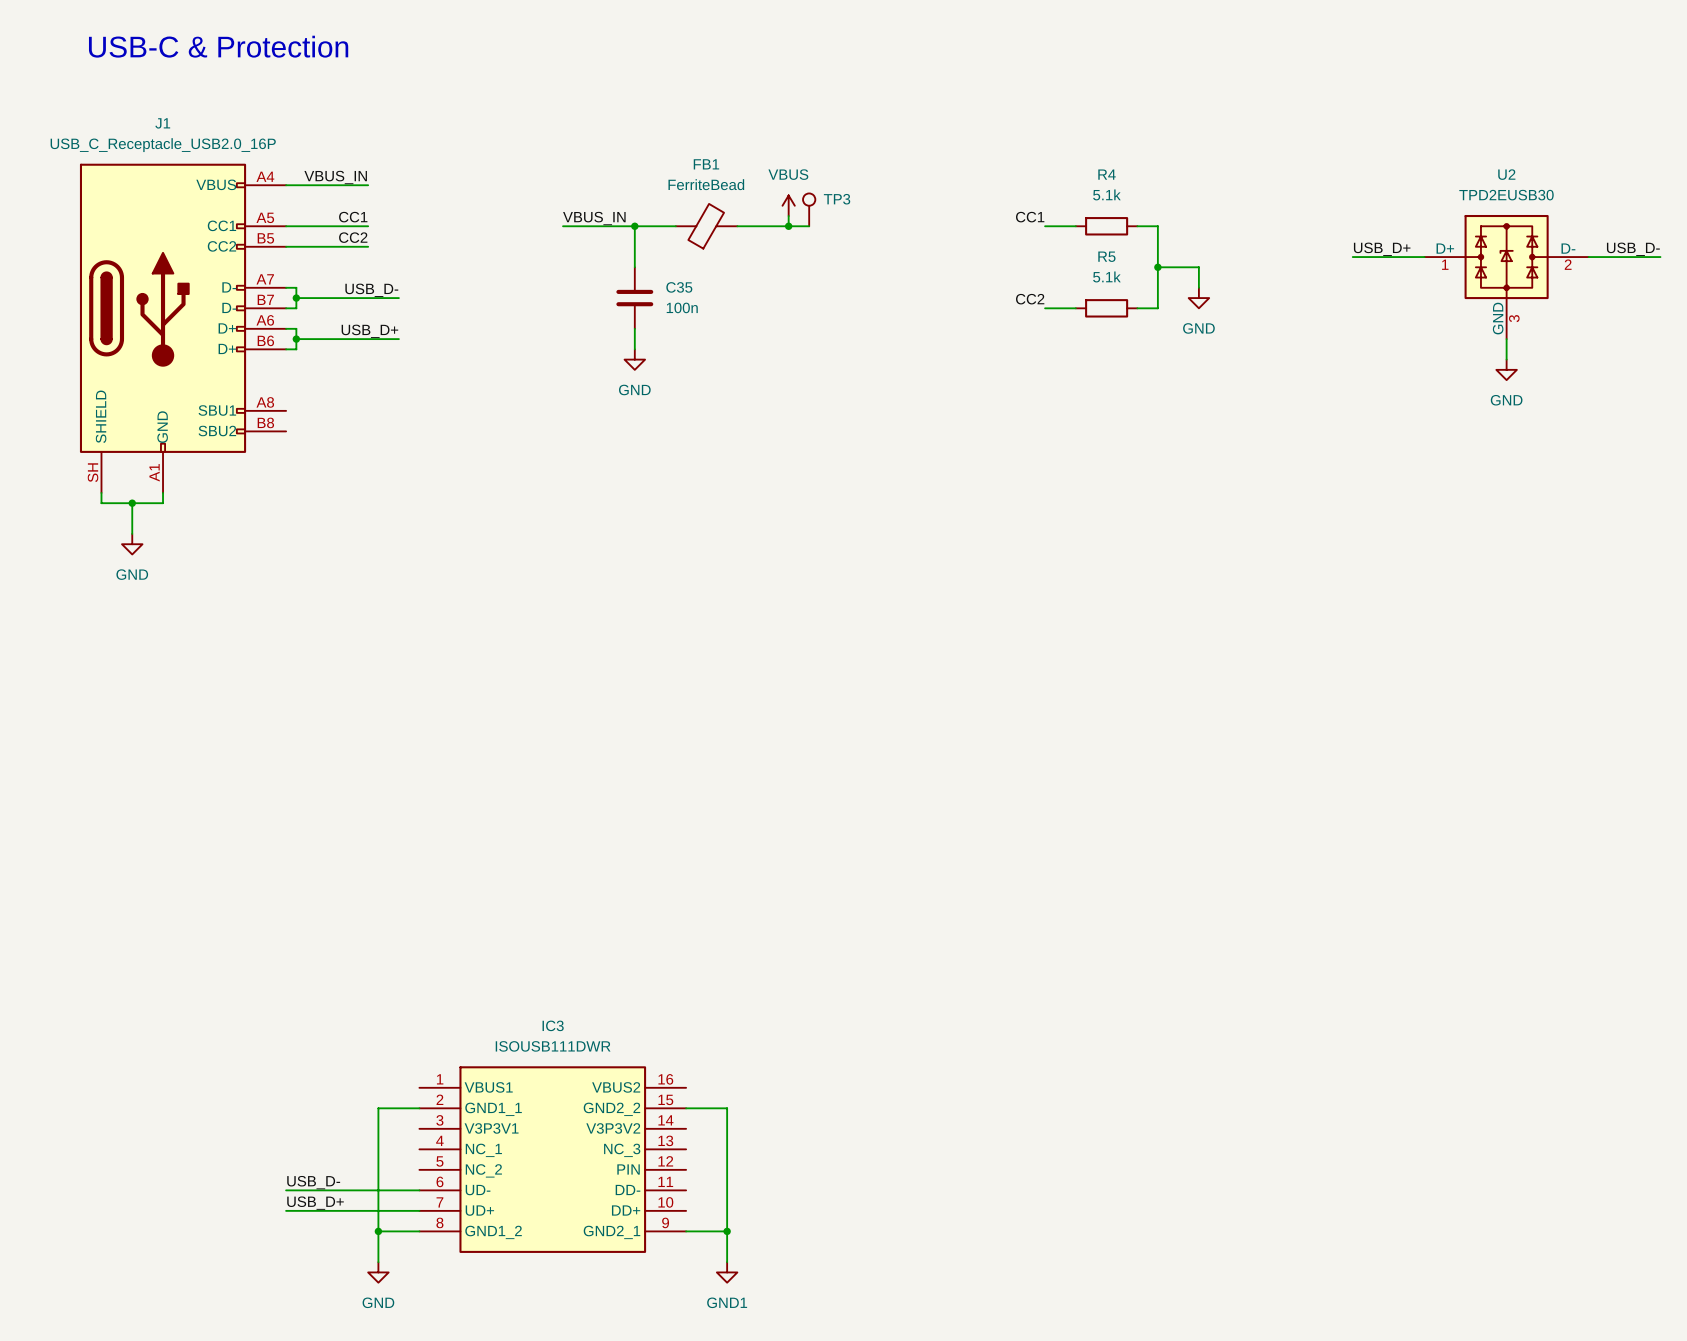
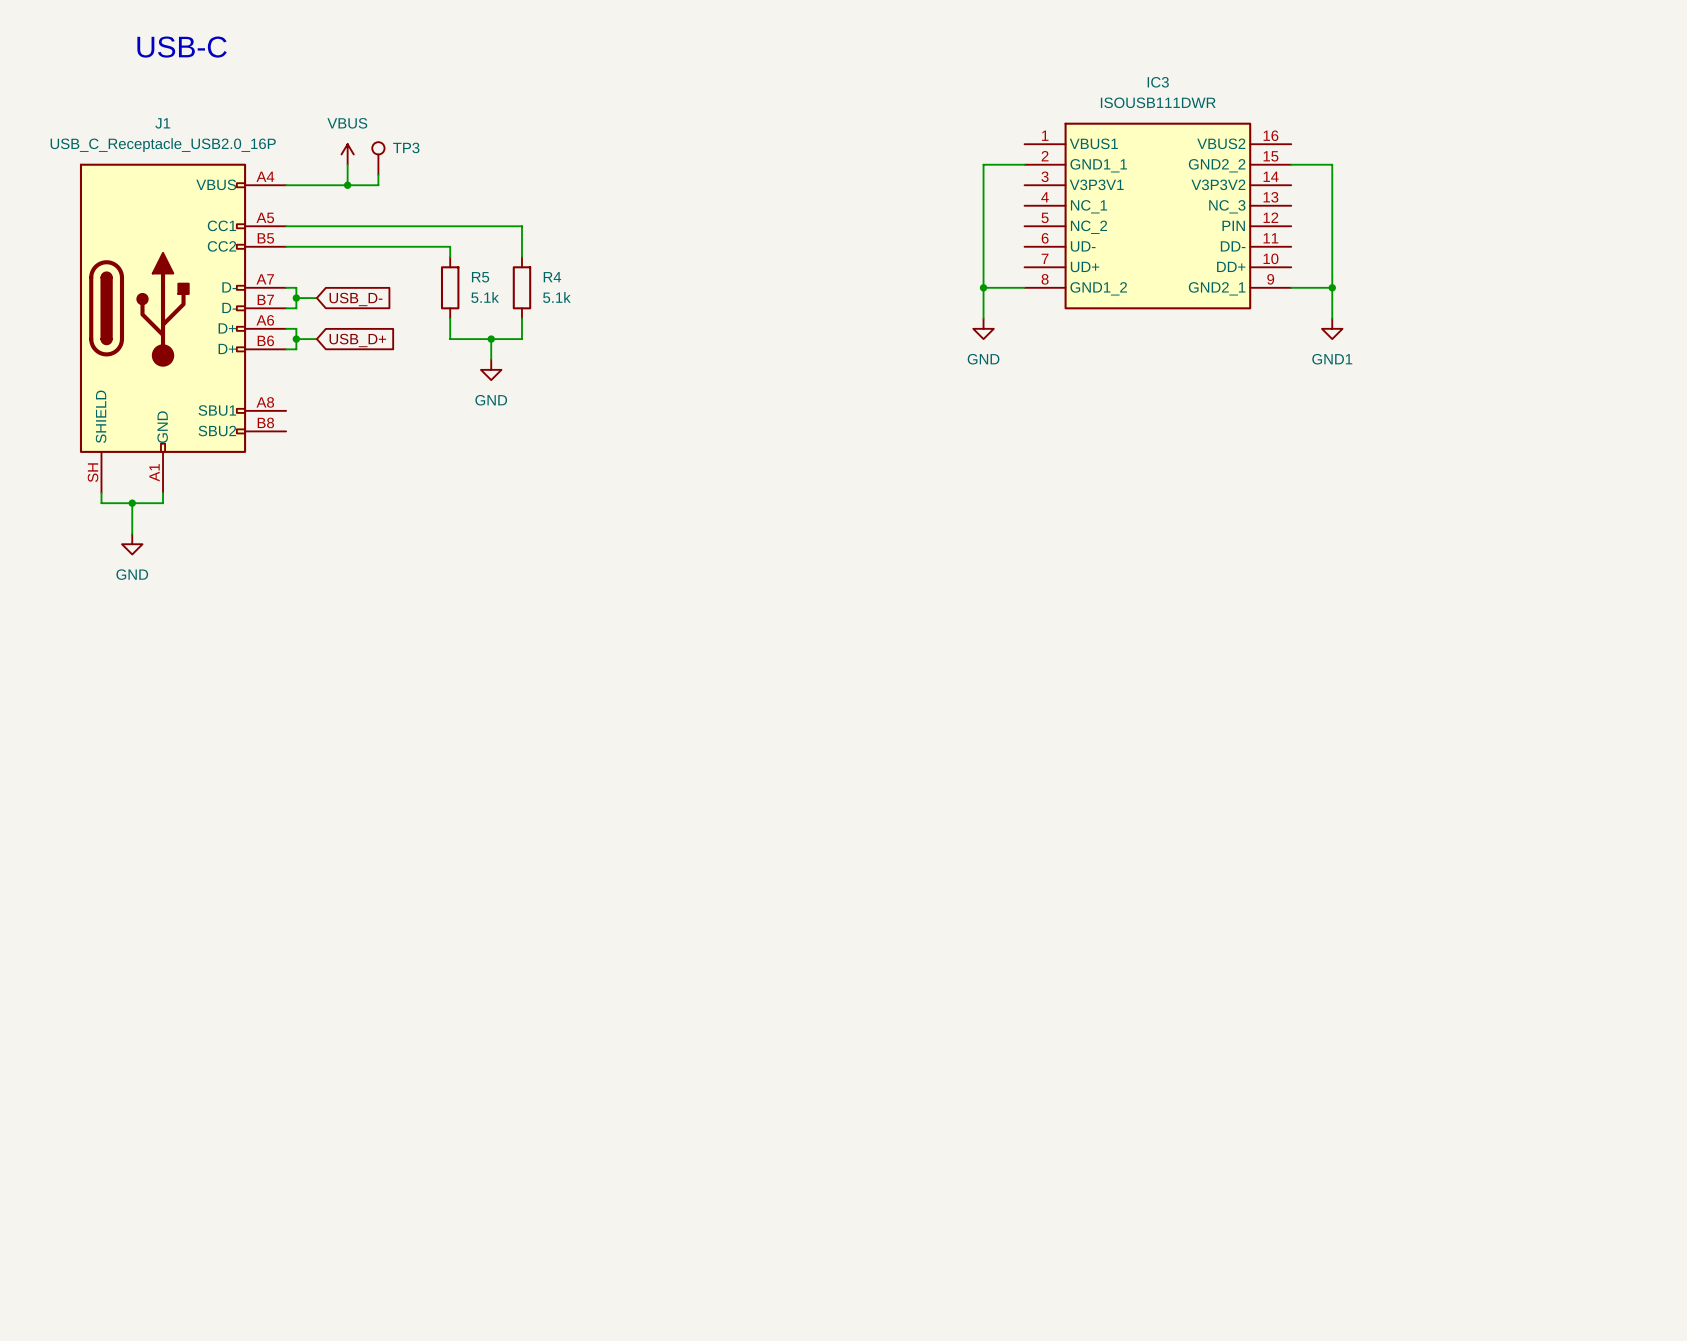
text: USB-C & Protection (218, 46) -> none
text: none -> USB-C (182, 47)
power symbol: none -> VBUS (347, 154)
wire: none -> (347, 164) (347, 185)
wire: none -> (1024, 164) (983, 164) (983, 318)
wire: none -> (1291, 164) (1332, 164) (1332, 318)
wire: none -> (378, 174) (378, 185) (368, 185)
R4 name position: R4 (1107, 174) -> R4 (552, 277)
label: VBUS_IN (335, 177) -> none
junction: none -> (347, 185)
power symbol: VBUS (788, 205) -> none
TP3 position: (809, 209) -> (378, 158)
wire: (788, 216) (788, 226) -> none
label: CC1 (353, 217) -> none
label: CC1 (1030, 217) -> none
label: VBUS_IN (594, 218) -> none
wire: none -> (368, 226) (521, 226) (521, 257)
wire: (563, 226) (675, 226) -> none
wire: (634, 226) (634, 267) -> none
junction: (634, 226) -> none
FB1: FerriteBead (706, 226) -> none
wire: (737, 226) (809, 226) -> none
junction: (788, 226) -> none
R4 rotation: 0° (1106, 226) -> 90° clockwise (521, 287)
R4 position: (1106, 226) -> (521, 287)
label: CC2 (353, 237) -> none
wire: none -> (368, 246) (450, 246) (450, 257)
label: USB_D+ (1382, 249) -> none
label: USB_D- (1633, 249) -> none
R5 name position: R5 (1106, 256) -> R5 (480, 277)
wire: (1352, 257) (1424, 257) -> none
wire: (1588, 257) (1660, 257) -> none
junction: (1157, 267) -> none
U2: TPD2EUSB30 (1506, 277) -> none
wire: none -> (983, 287) (1024, 287)
junction: none -> (983, 287)
wire: none -> (1291, 287) (1332, 287)
junction: none -> (1332, 287)
label: USB_D- (371, 290) -> none
wire: (316, 298) (398, 298) -> none
C35: 100n (634, 298) -> none
power symbol: GND (1198, 298) -> none
global label: none -> USB_D- (355, 299)
label: CC2 (1030, 299) -> none
wire: (1045, 308) (1075, 308) -> none
R5 rotation: 0° (1106, 308) -> 90° clockwise (450, 287)
R5 position: (1106, 308) -> (450, 287)
wire: none -> (450, 318) (450, 339) (521, 339) (521, 318)
wire: (634, 328) (634, 349) -> (491, 339) (491, 359)
power symbol: none -> GND (983, 328)
power symbol: none -> GND1 (1332, 328)
label: USB_D+ (369, 331) -> none
wire: (316, 339) (398, 339) -> none
junction: none -> (491, 339)
wire: (1506, 339) (1506, 359) -> none
global label: none -> USB_D+ (357, 340)
power symbol position: GND (634, 359) -> GND (491, 369)
power symbol: GND (1506, 369) -> none
wire: (419, 1108) (378, 1108) (378, 1262) -> none
wire: (686, 1108) (727, 1108) (727, 1262) -> none
IC3 position: (552, 1159) -> (1157, 216)
label: USB_D- (313, 1182) -> none
wire: (286, 1190) (419, 1190) -> none
label: USB_D+ (315, 1203) -> none
wire: (286, 1210) (419, 1210) -> none
wire: (378, 1231) (419, 1231) -> none
junction: (378, 1231) -> none
wire: (686, 1231) (727, 1231) -> none
junction: (727, 1231) -> none
power symbol: GND (378, 1272) -> none
power symbol: GND1 (727, 1272) -> none

